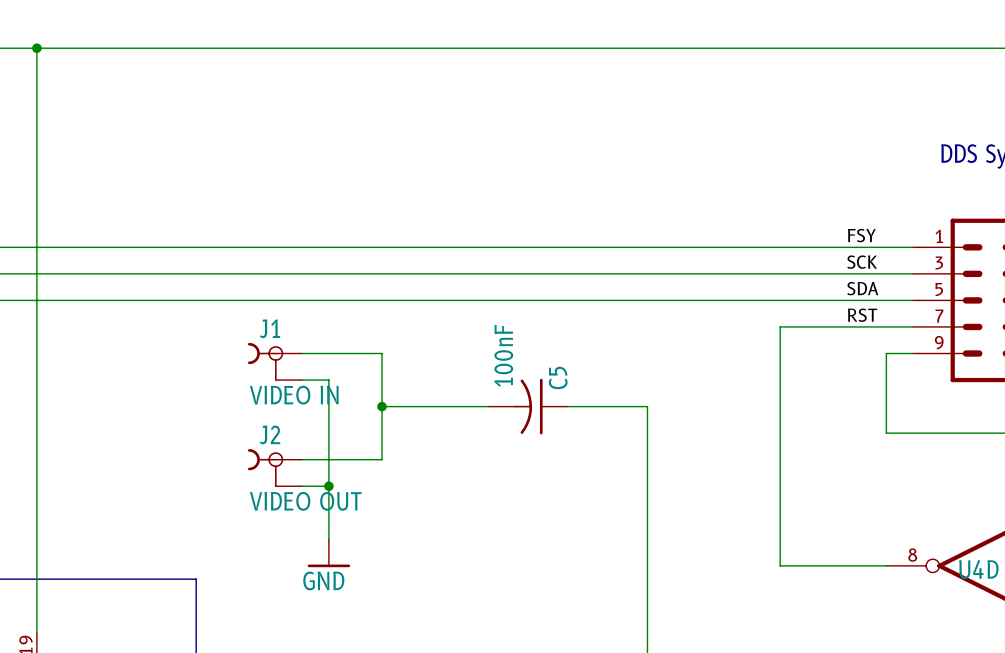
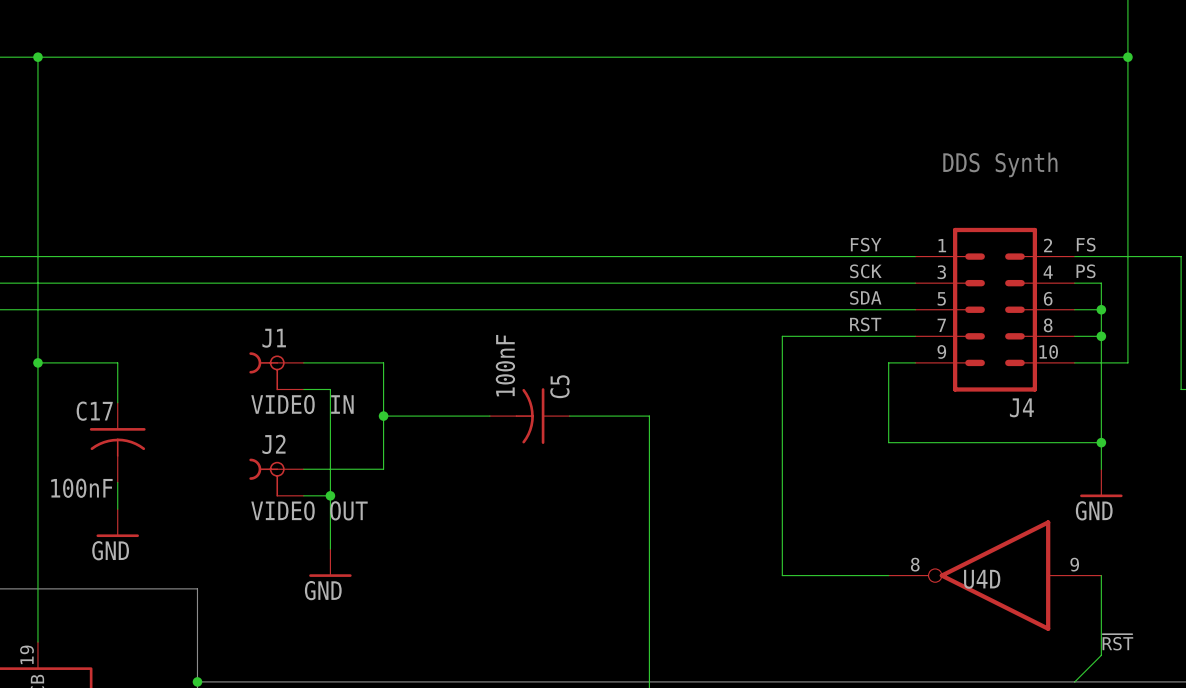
wire: none -> (37, 362) (117, 362) (117, 402)
junction: none -> (37, 362)
C17: none -> 100nF (117, 442)
wire: none -> (117, 482) (117, 509)
power symbol: none -> GND (117, 523)

